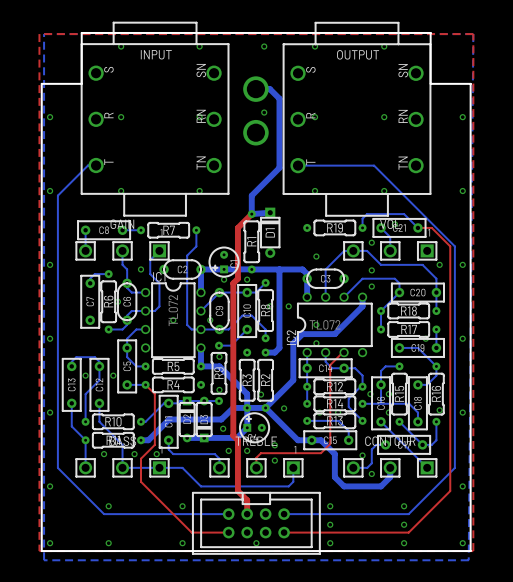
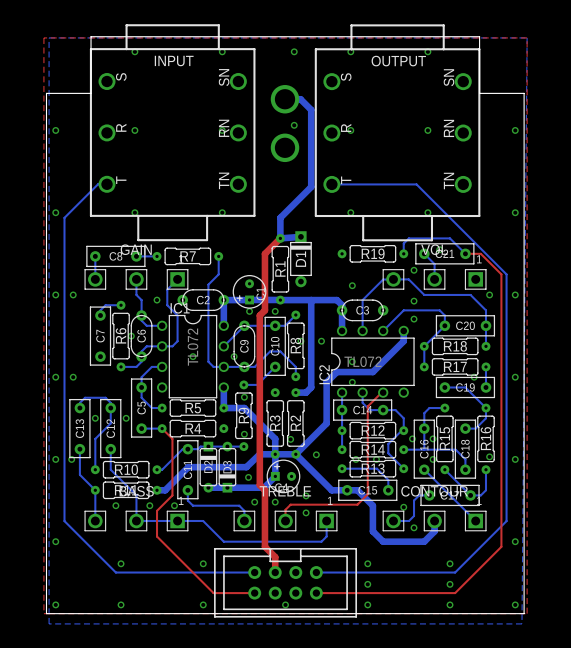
via: none -> (73, 294)
via: none -> (73, 377)
via: none -> (71, 459)

